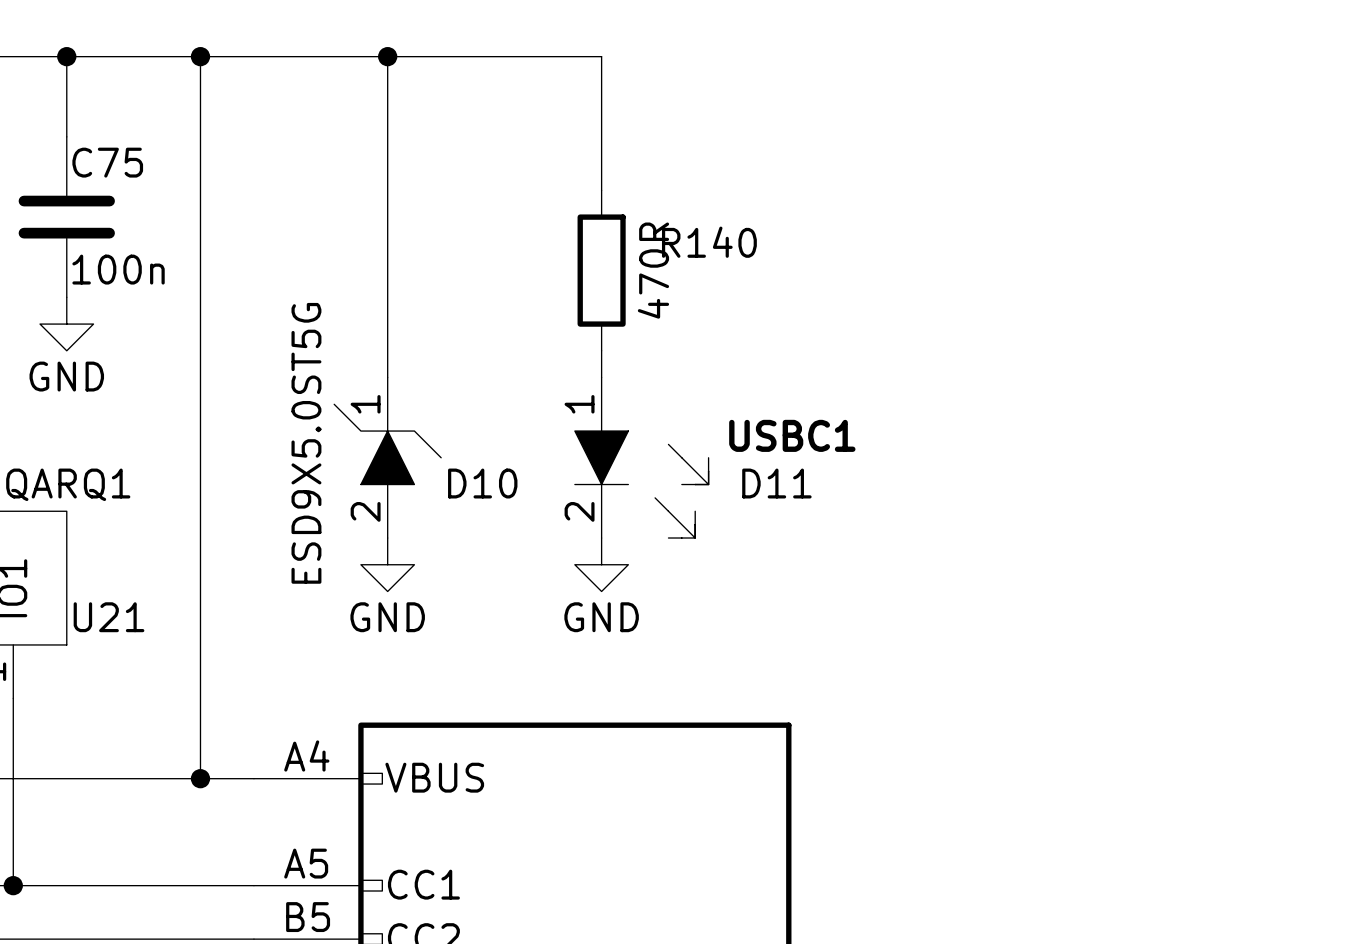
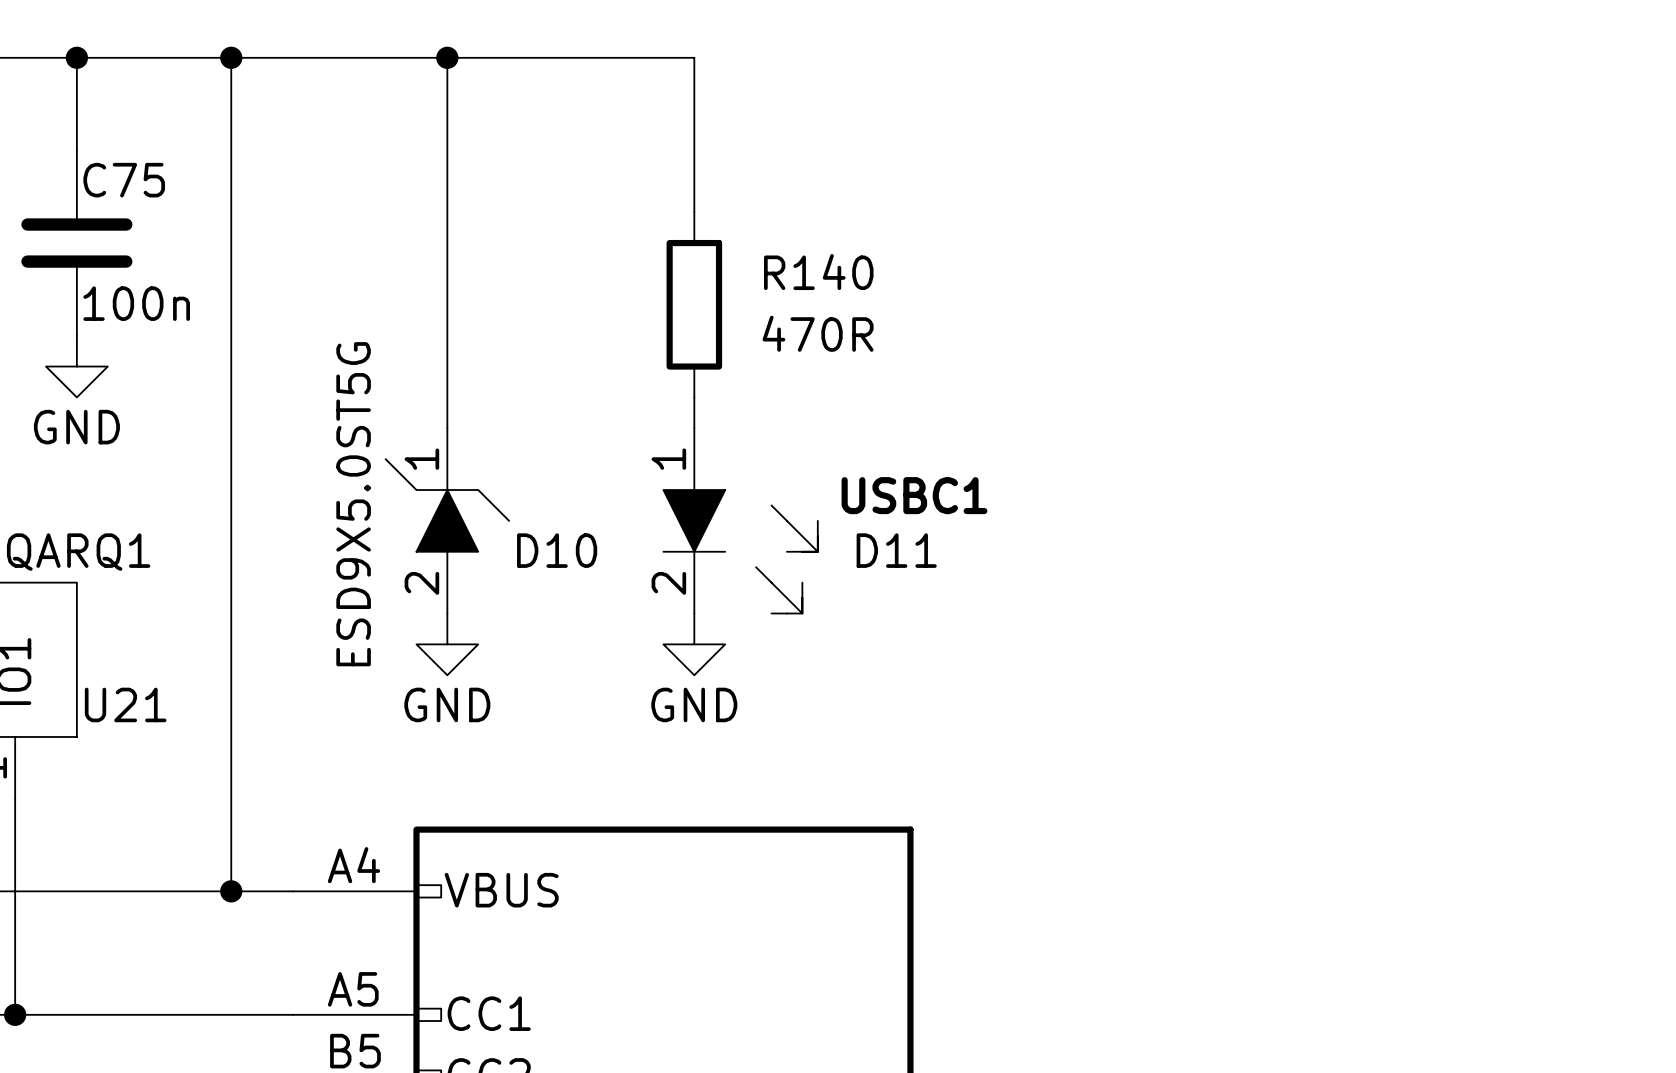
R140 text rotation: 0° (653, 270) -> 90° clockwise (818, 333)

